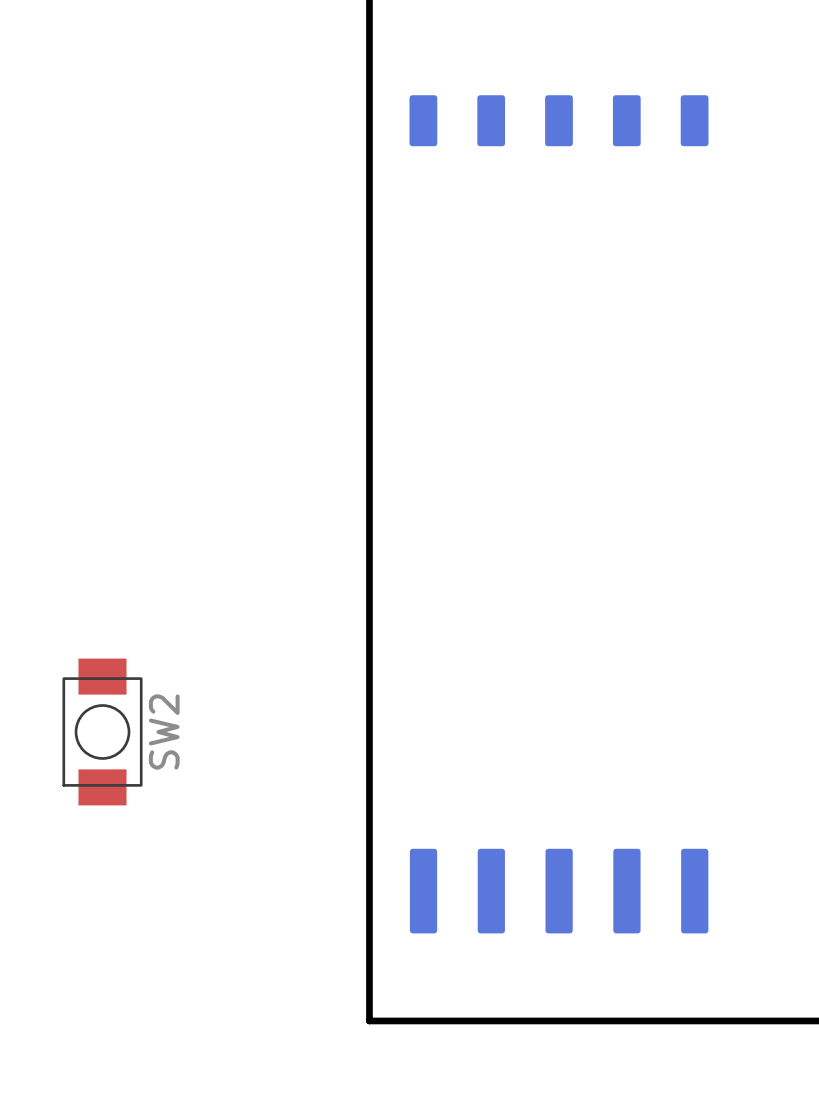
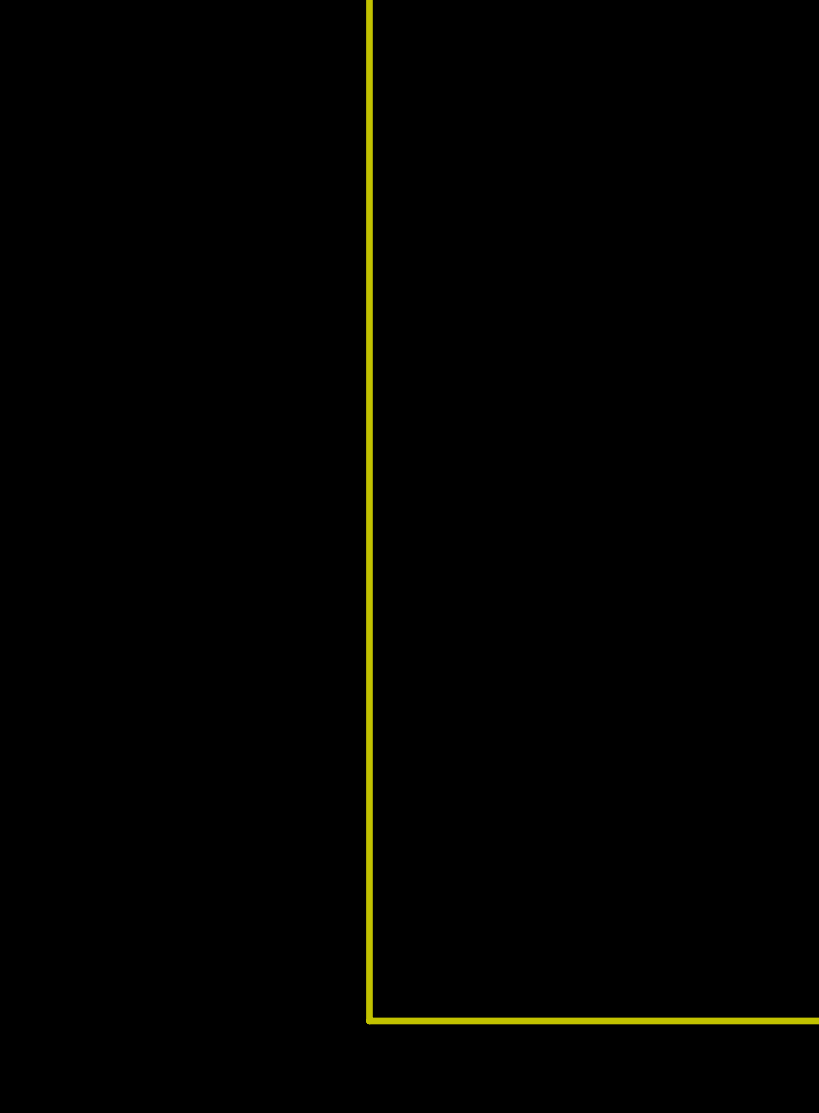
part: (559, 120) -> none
SW2: (102, 731) -> none
part: (559, 891) -> none

